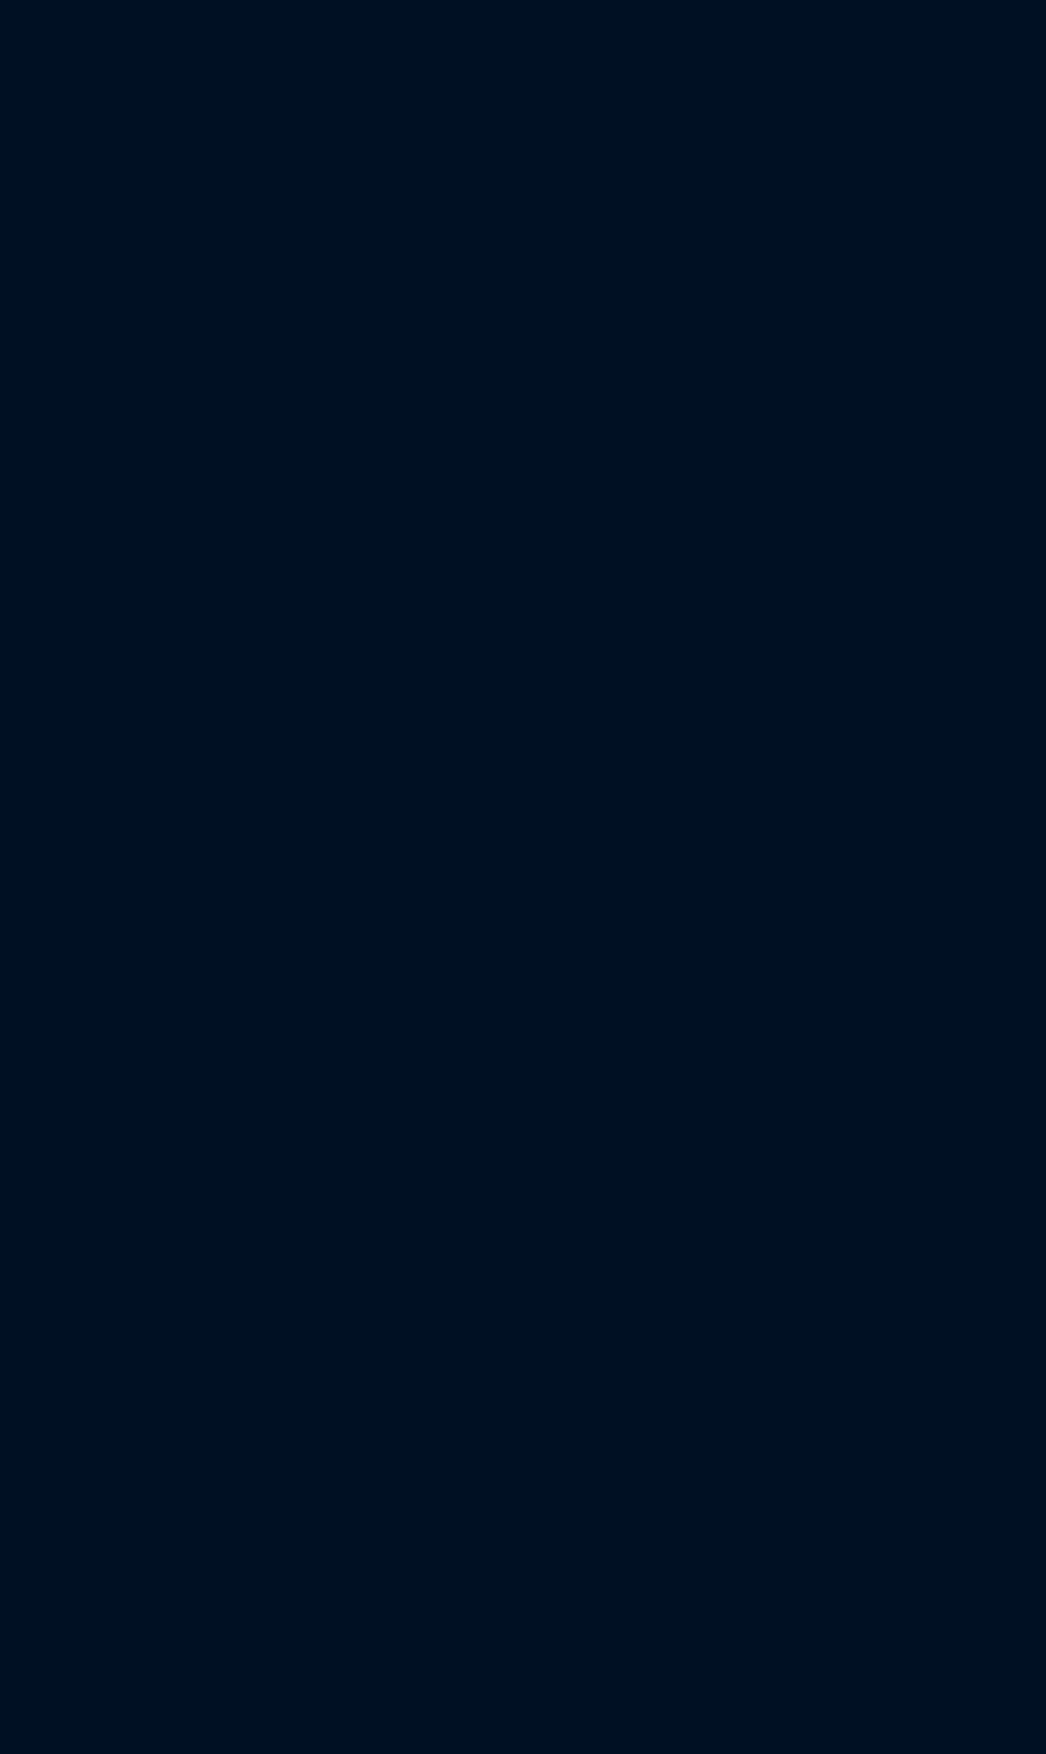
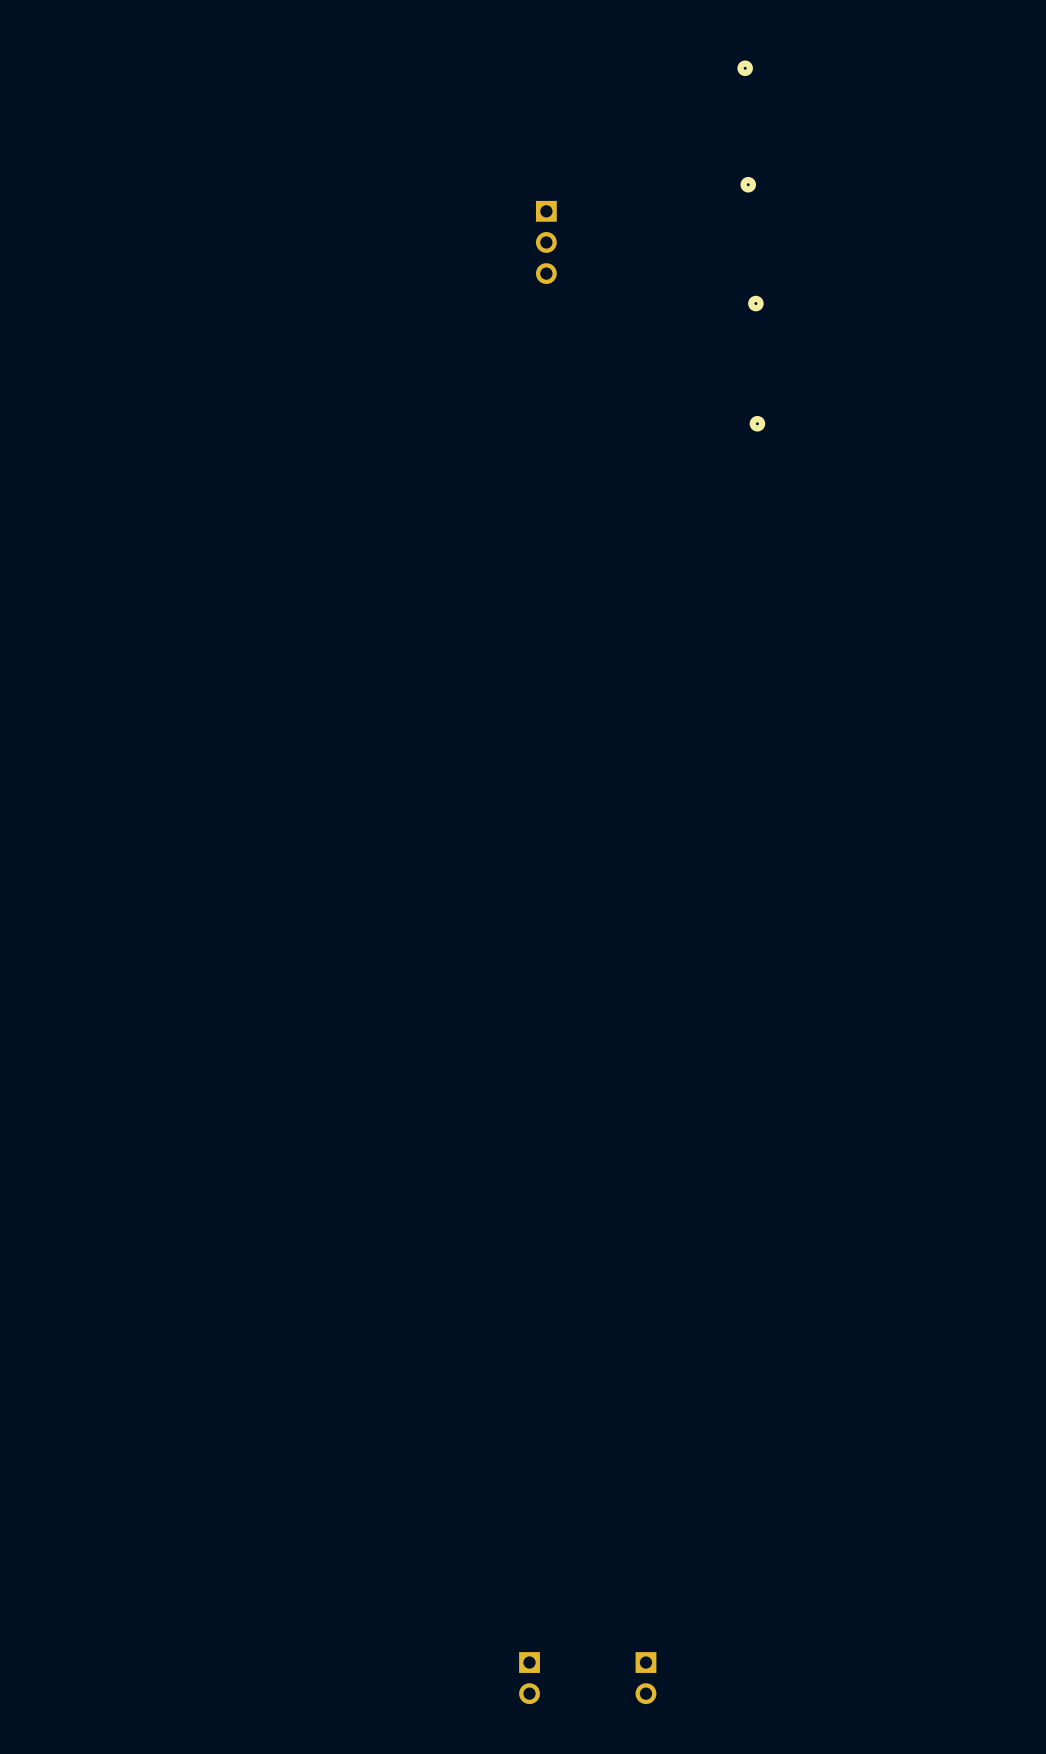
part: none -> (745, 68)
part: none -> (748, 184)
part: none -> (546, 242)
part: none -> (755, 303)
part: none -> (757, 423)
part: none -> (529, 1678)
part: none -> (645, 1678)

